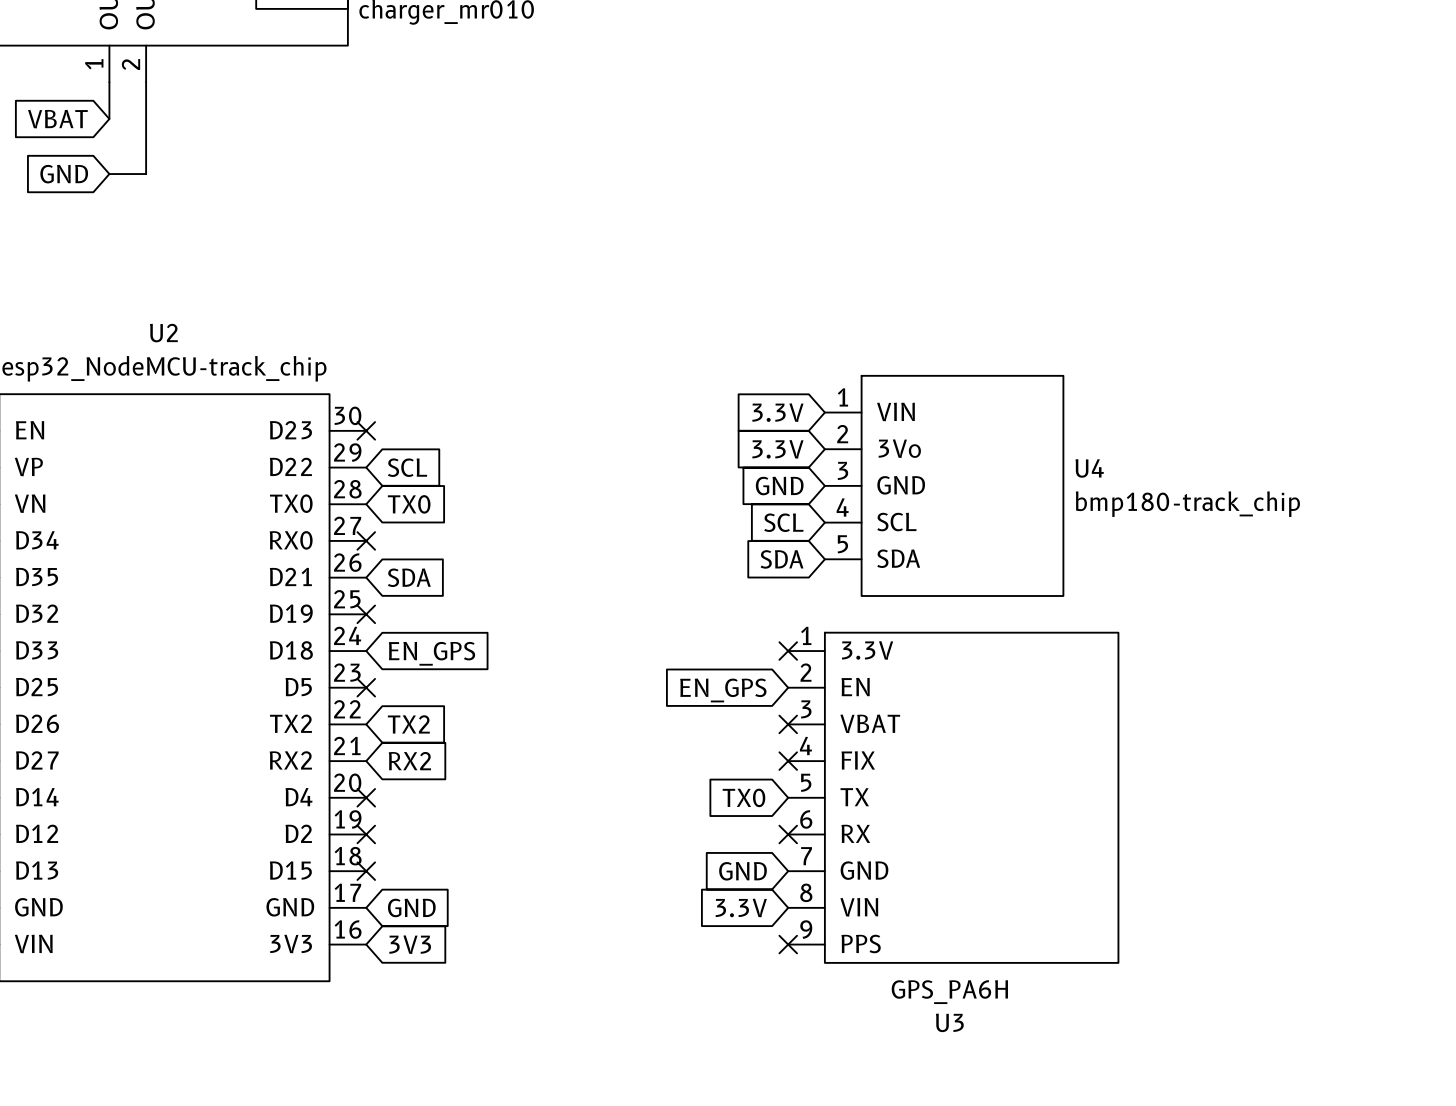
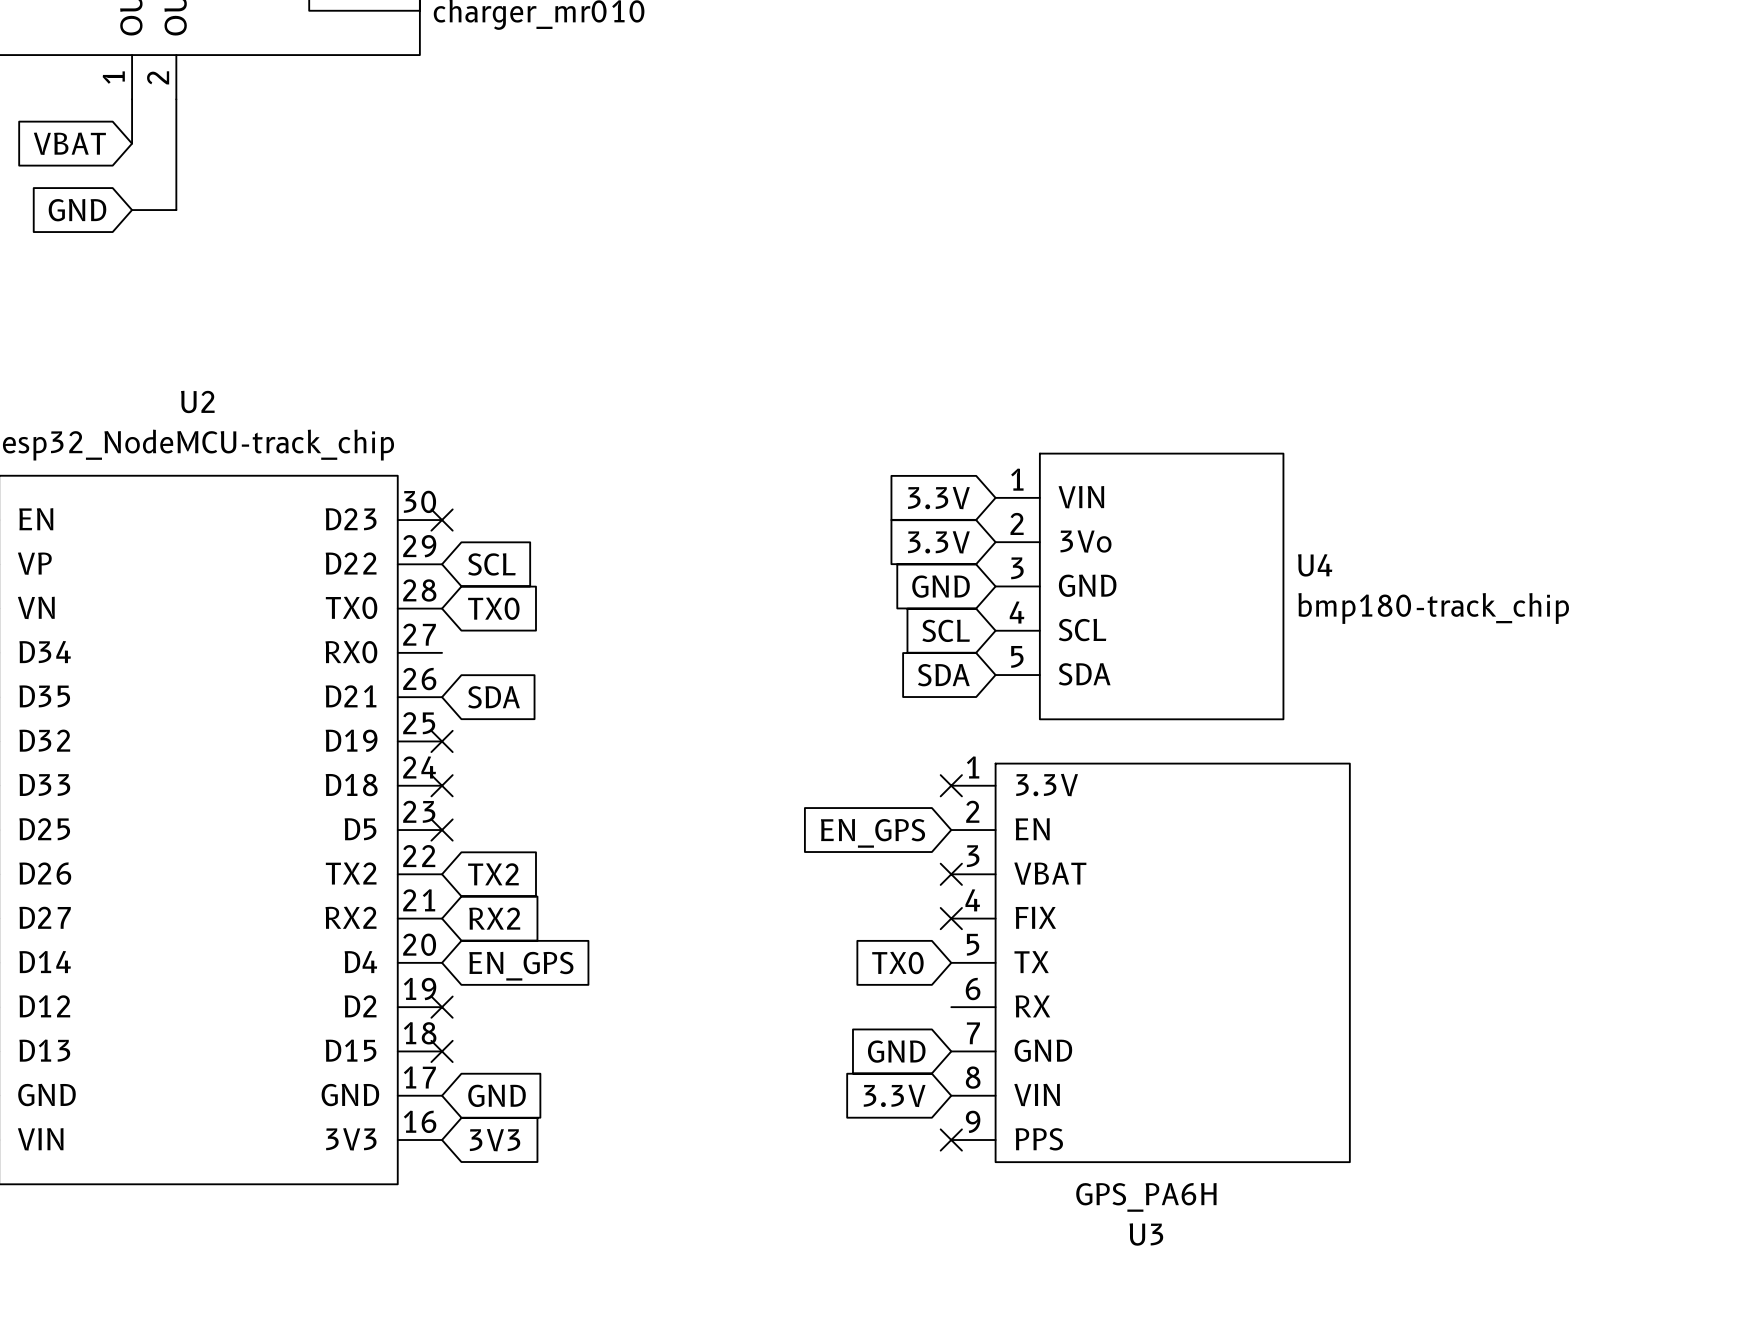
no-connect mark: (366, 540) -> none
no-connect mark: none -> (442, 785)
global label position: EN_GPS (431, 653) -> EN_GPS (521, 966)
no-connect mark: (366, 797) -> none
no-connect mark: (788, 834) -> none

